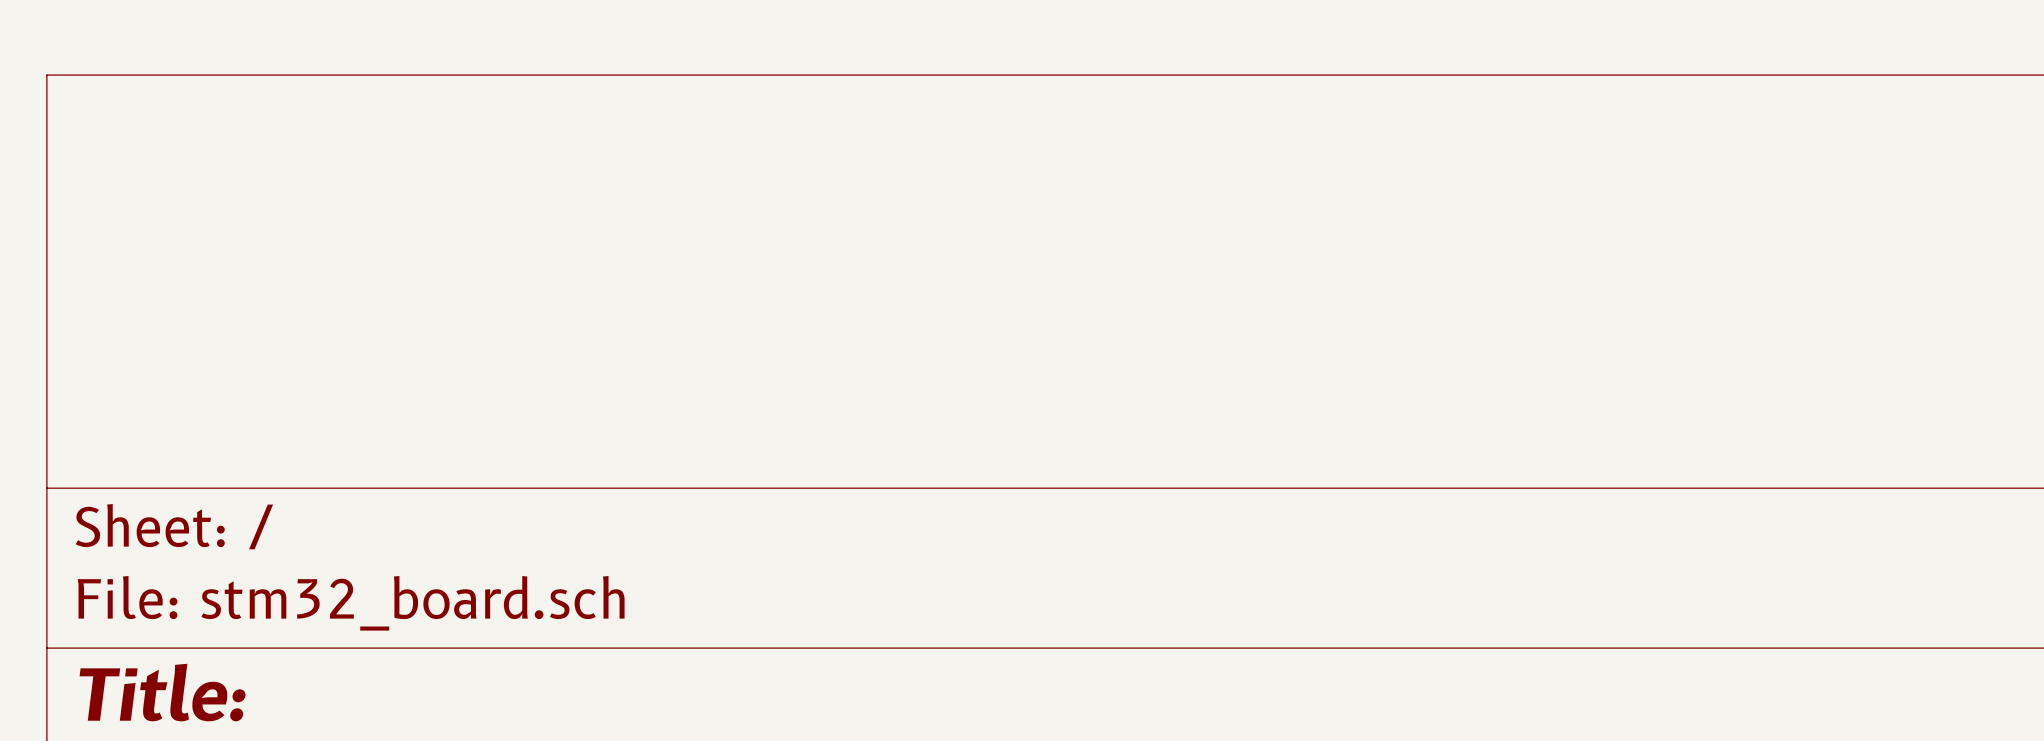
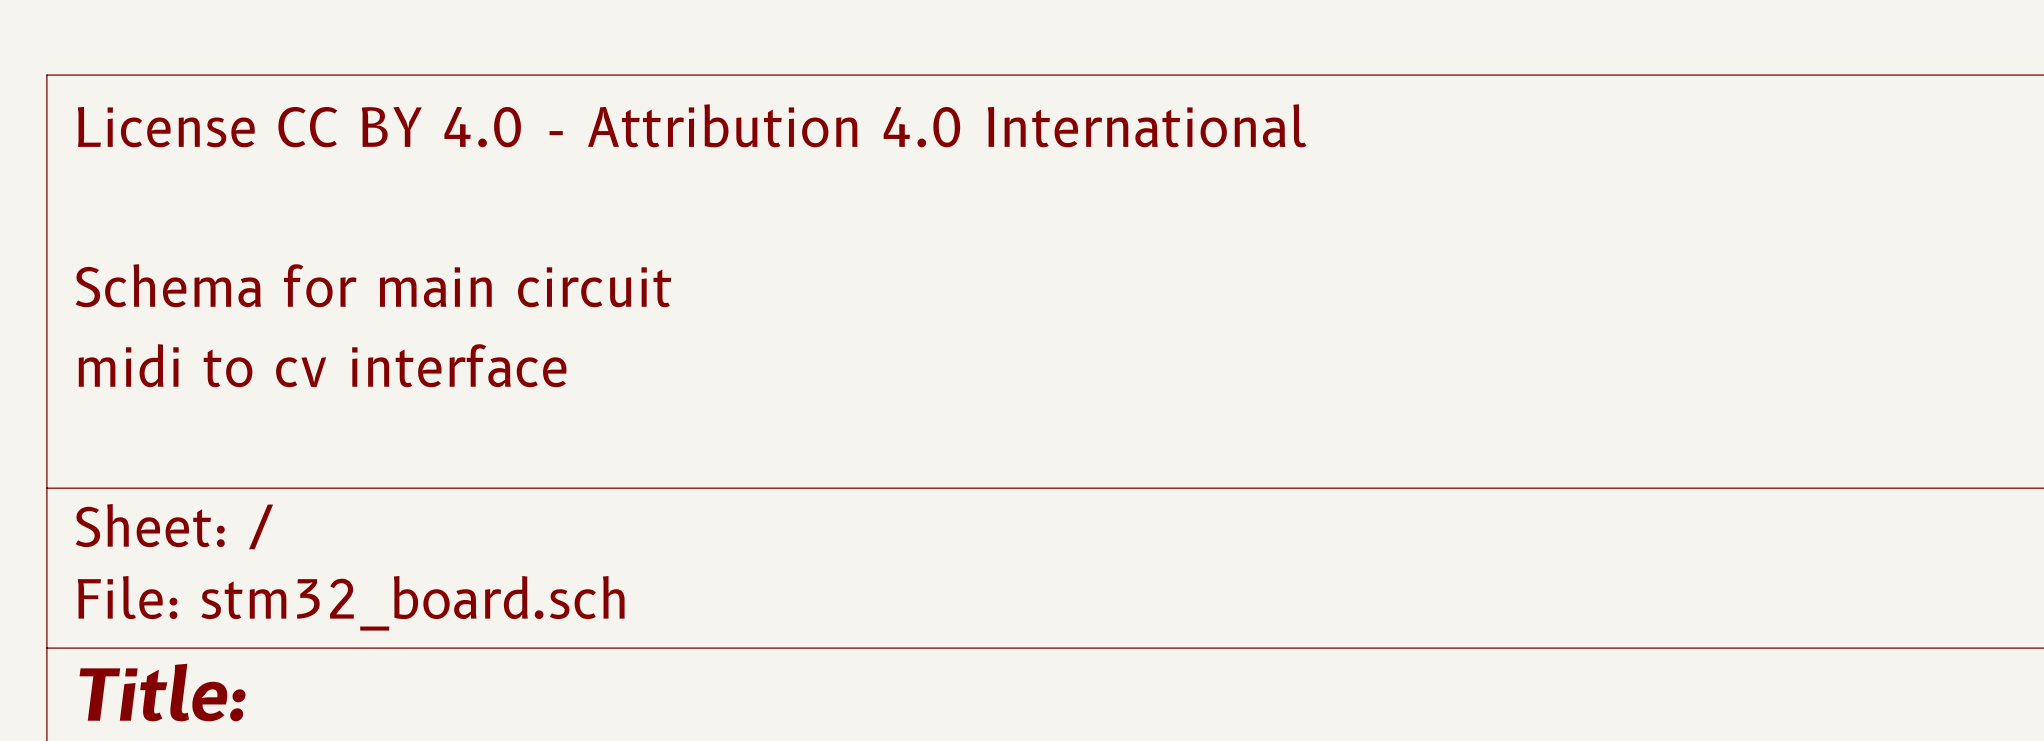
title block: none -> License CC BY 4.0 - Attribution 4.0 International (692, 125)
title block: none -> Schema for main circuit (373, 285)
title block: none -> midi to cv interface (322, 365)

